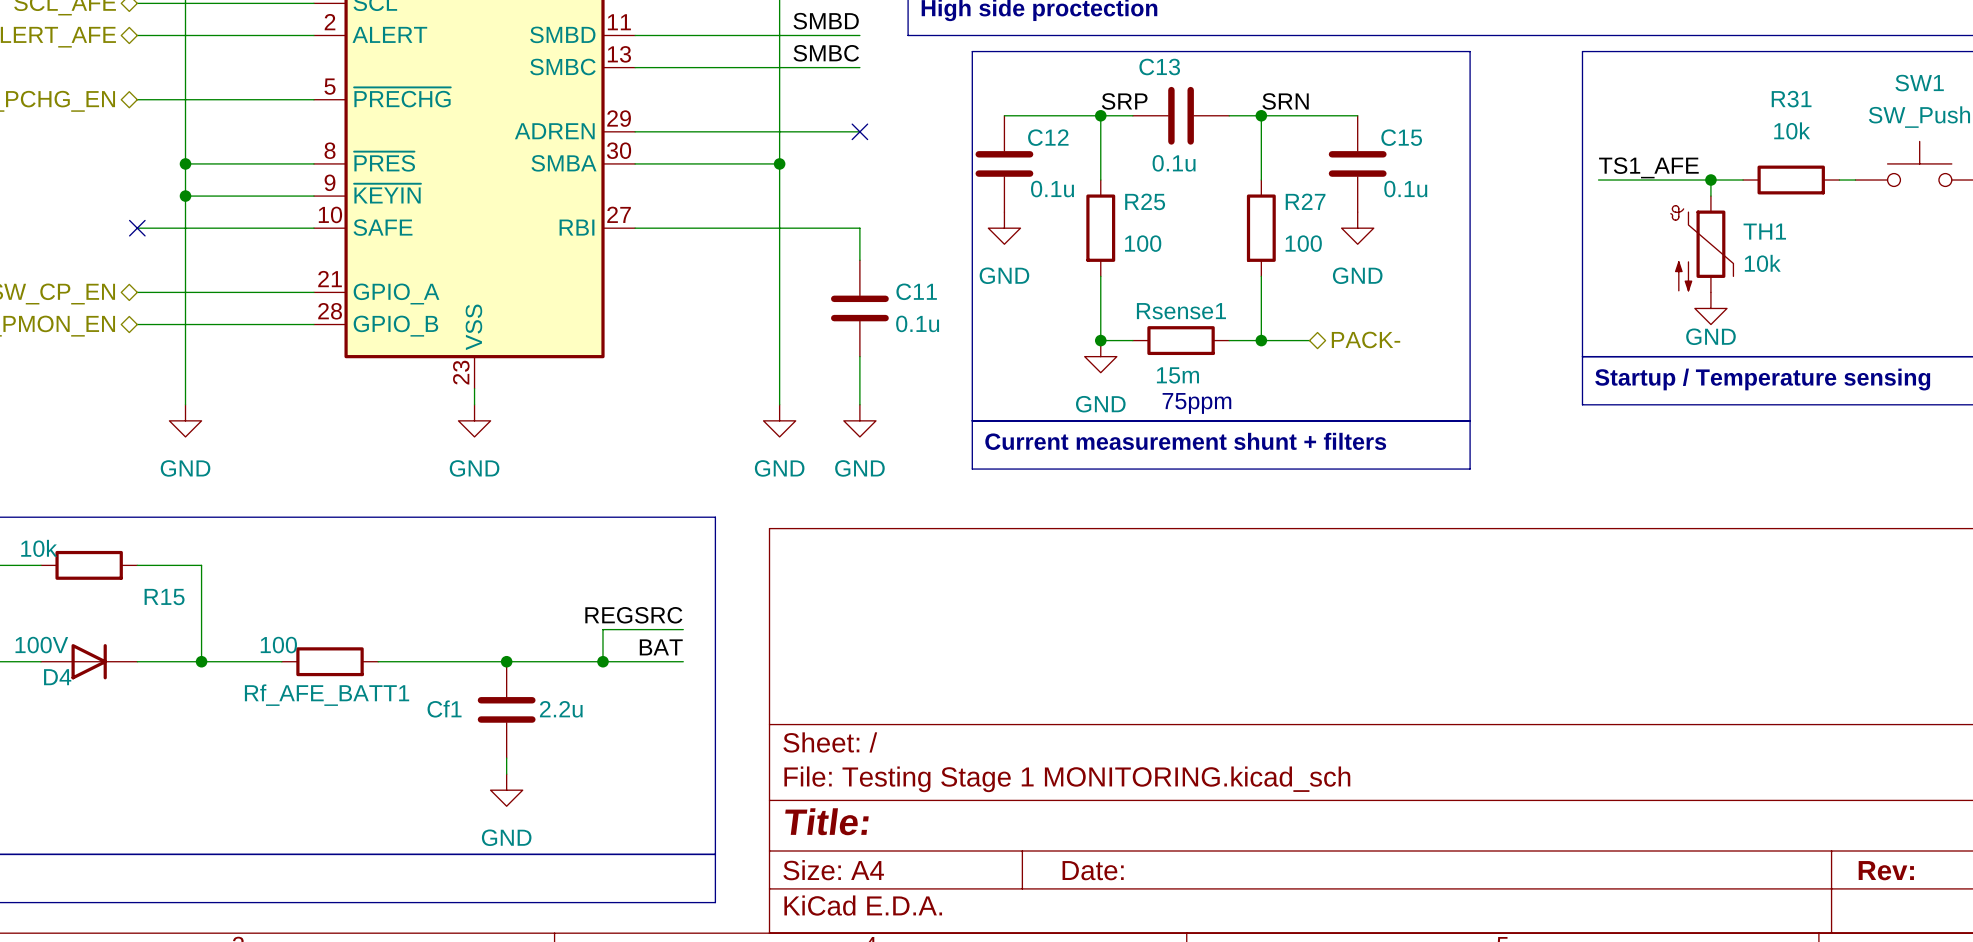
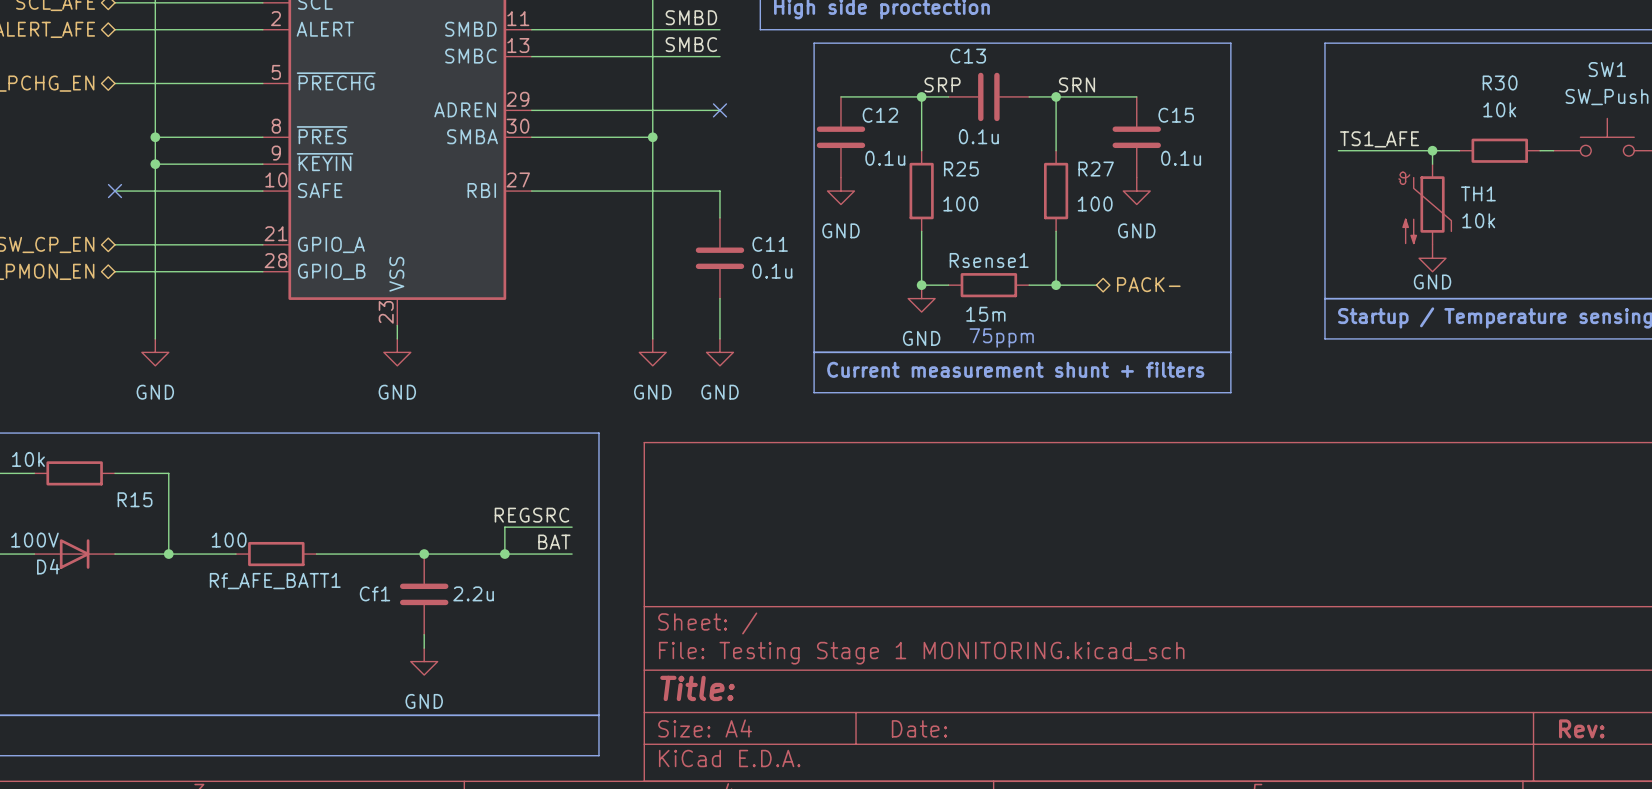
R31 name: R31 (1791, 99) -> R30 (1500, 82)

